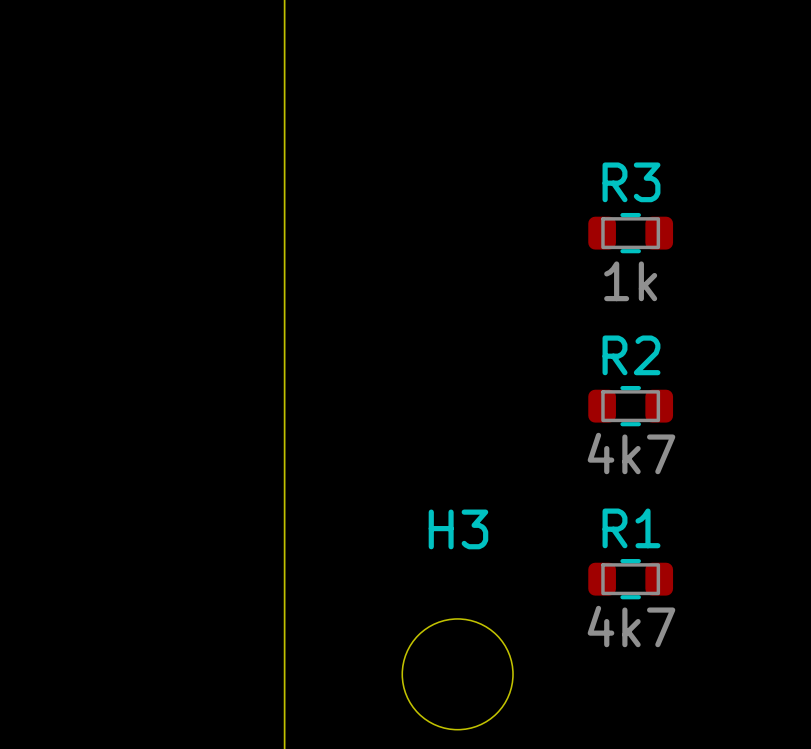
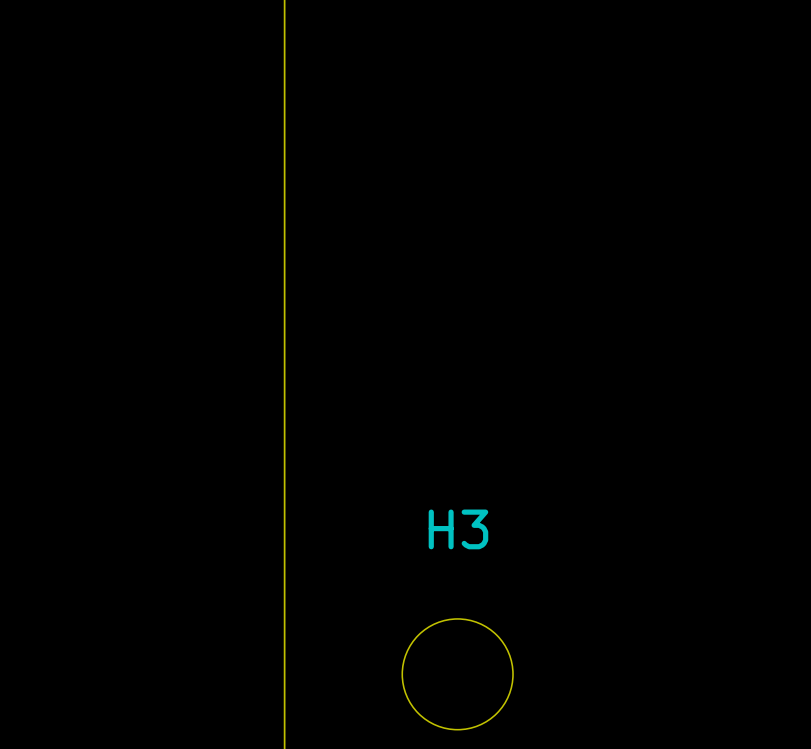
R3: 1k (630, 233) -> none
R2: 4k7 (630, 406) -> none
R1: 4k7 (630, 579) -> none

